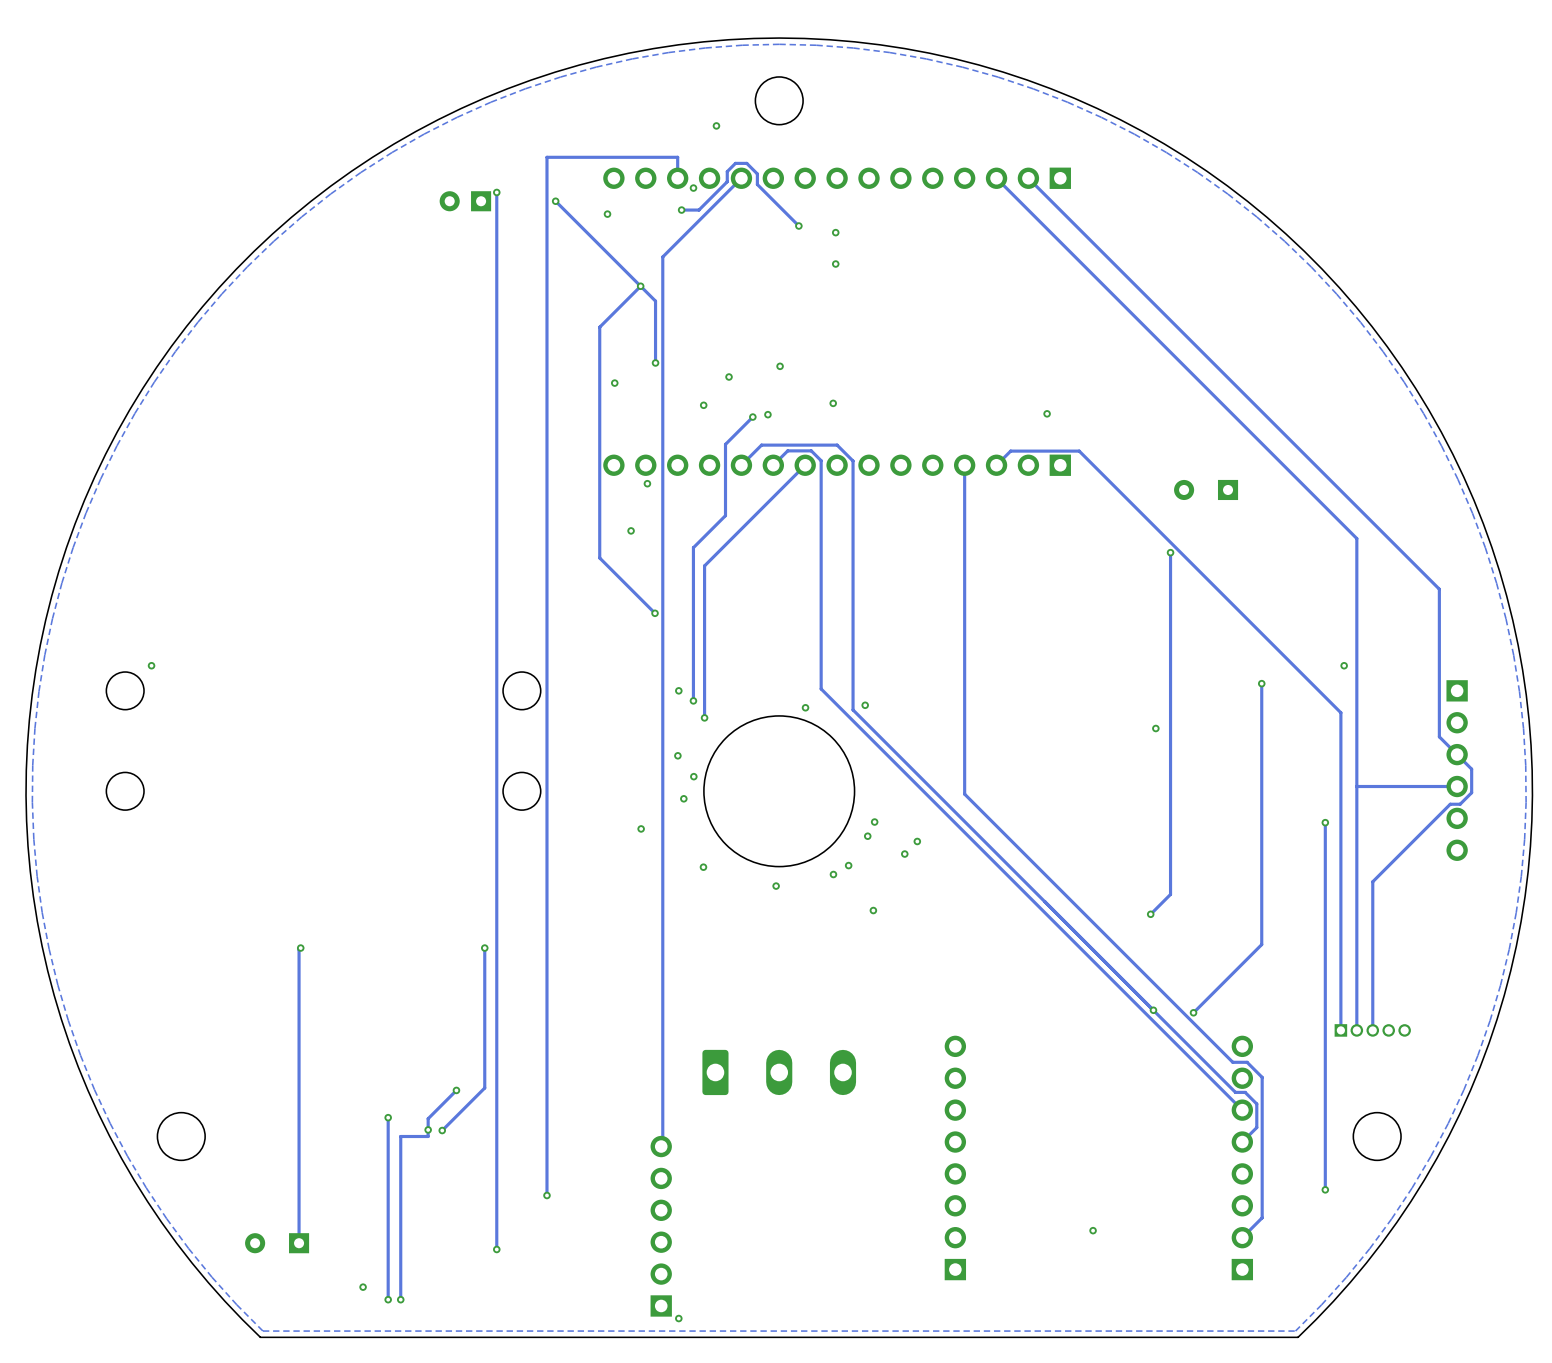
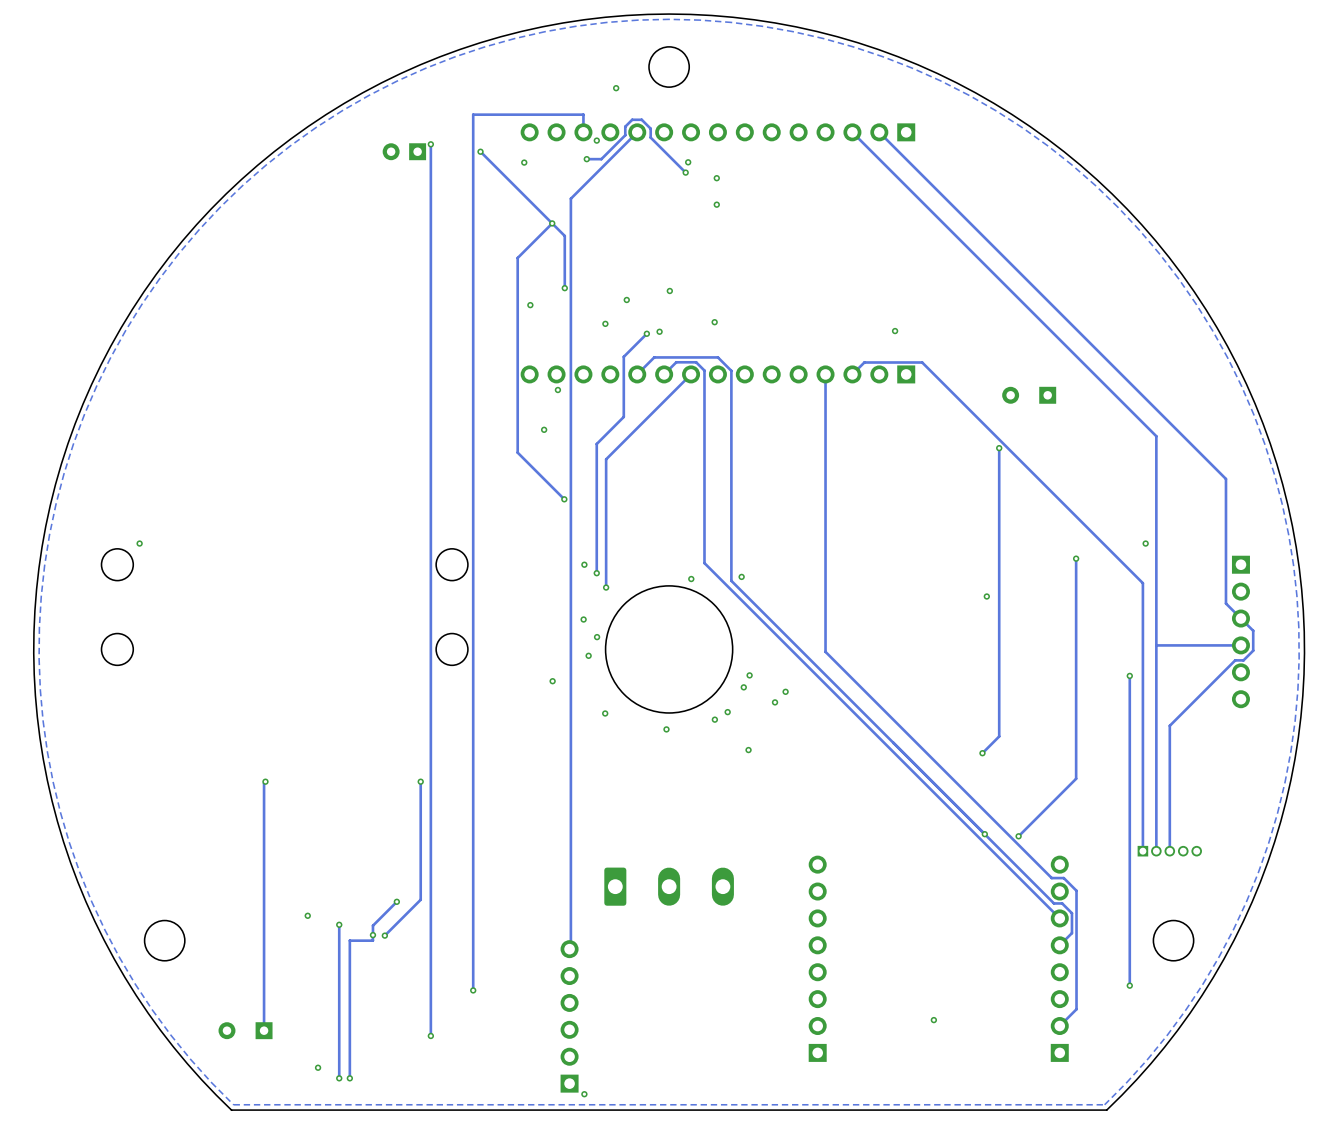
via: none -> (688, 162)
via: none -> (307, 915)

